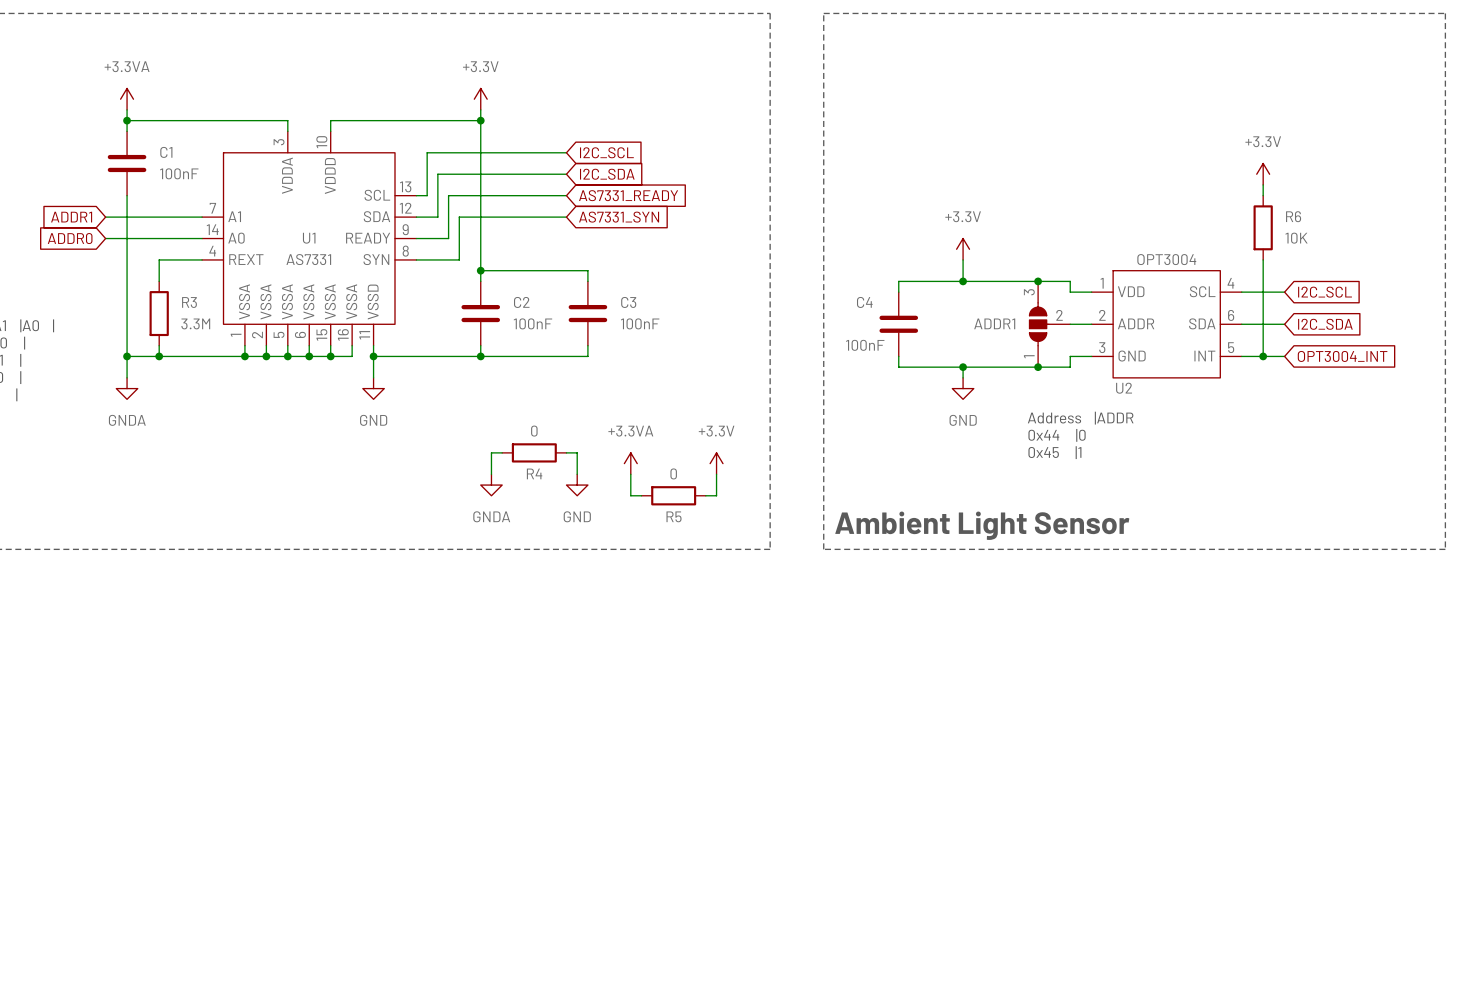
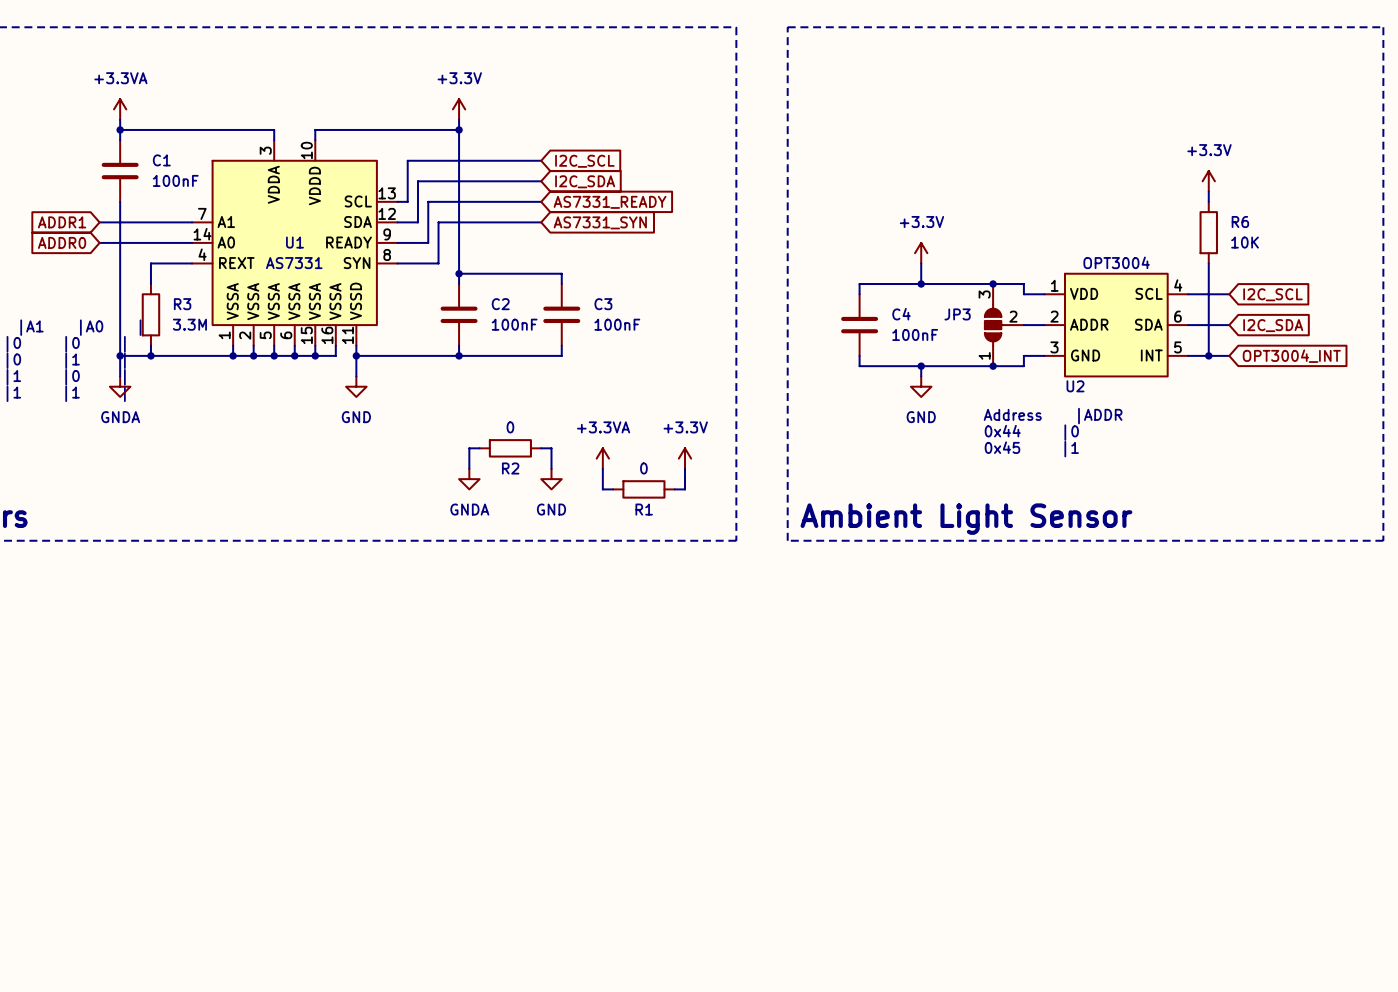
C4 name position: C4 (864, 302) -> C4 (901, 314)
ADDR1 name: ADDR1 (994, 323) -> JP3 (957, 314)
C4 value position: 100nF (865, 345) -> 100nF (915, 334)
R4 name: R4 (534, 473) -> R2 (510, 468)
R5 name: R5 (674, 516) -> R1 (644, 509)

